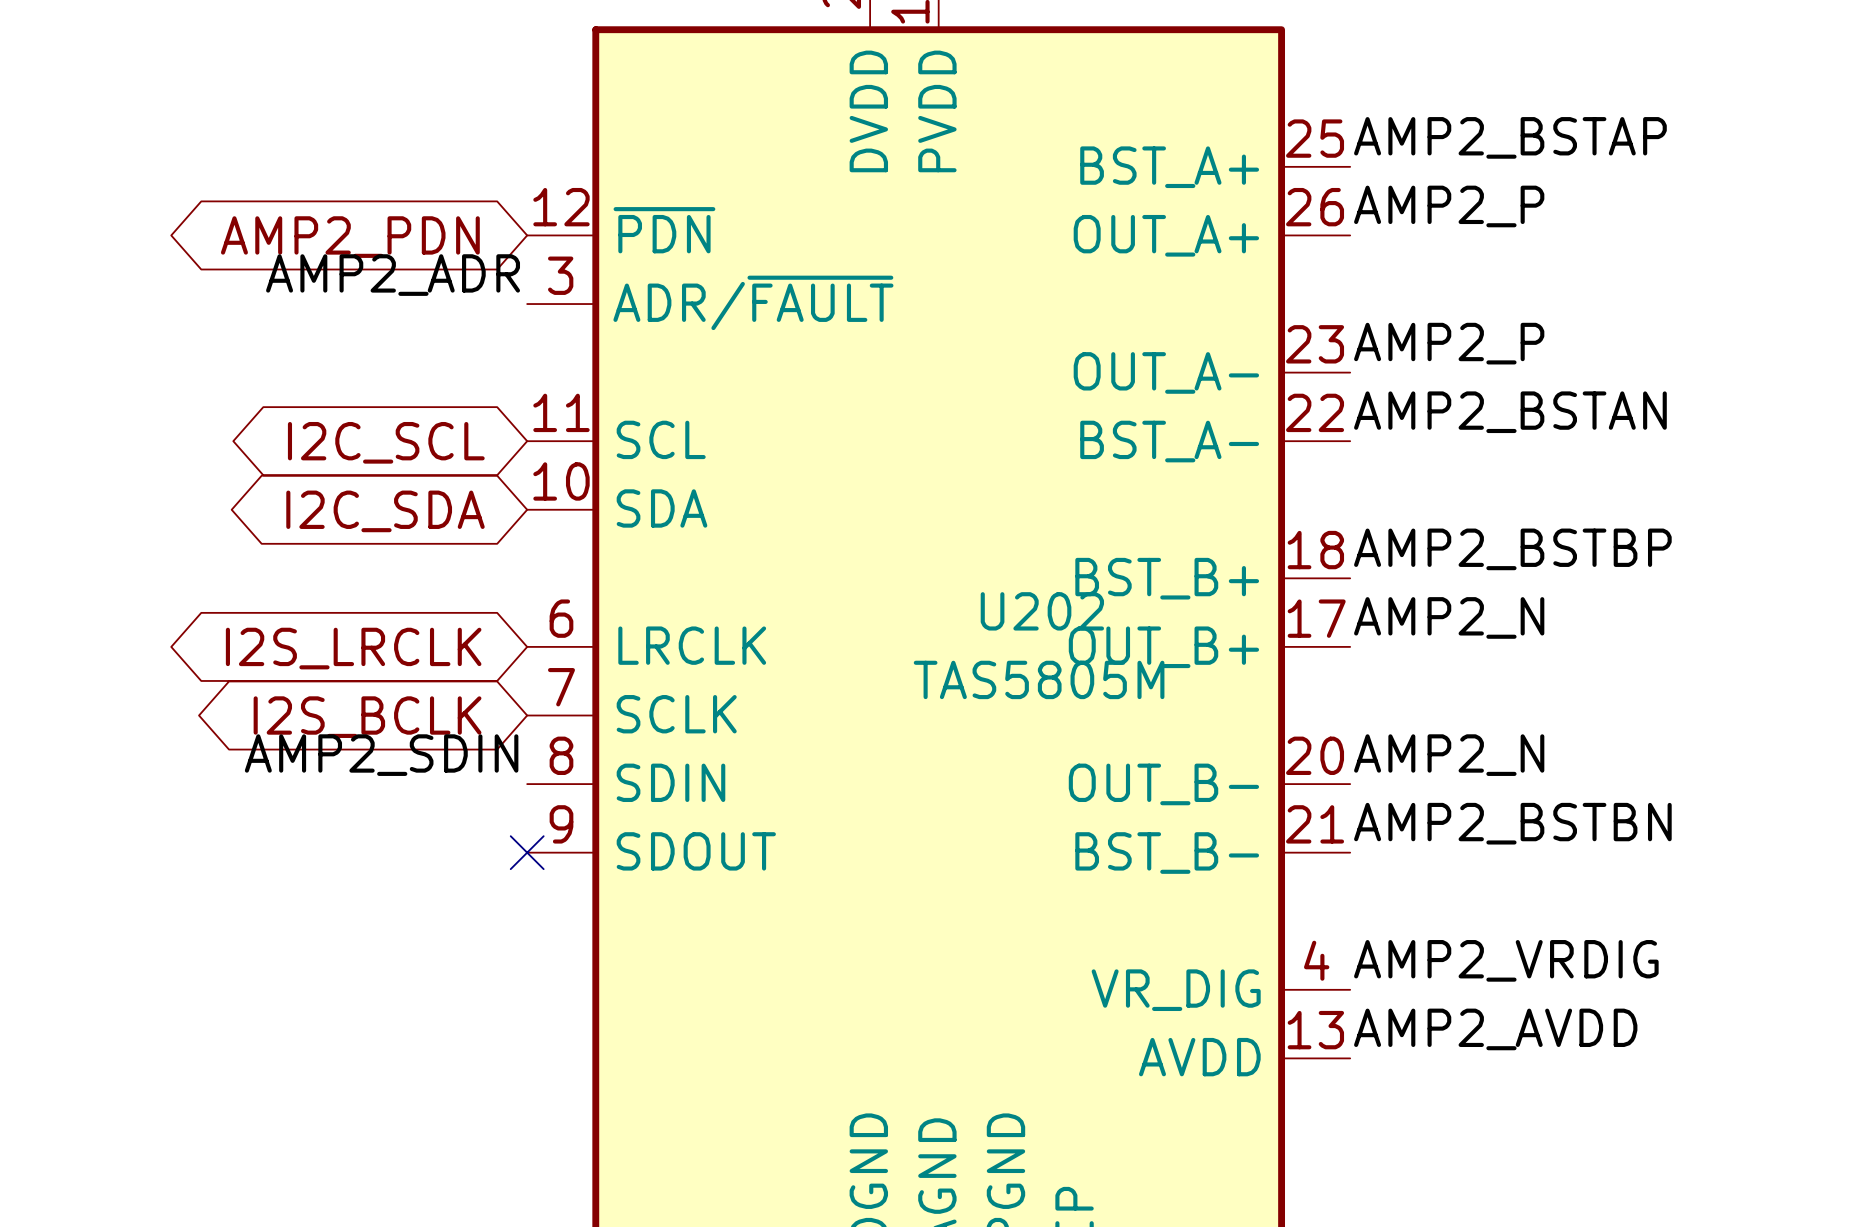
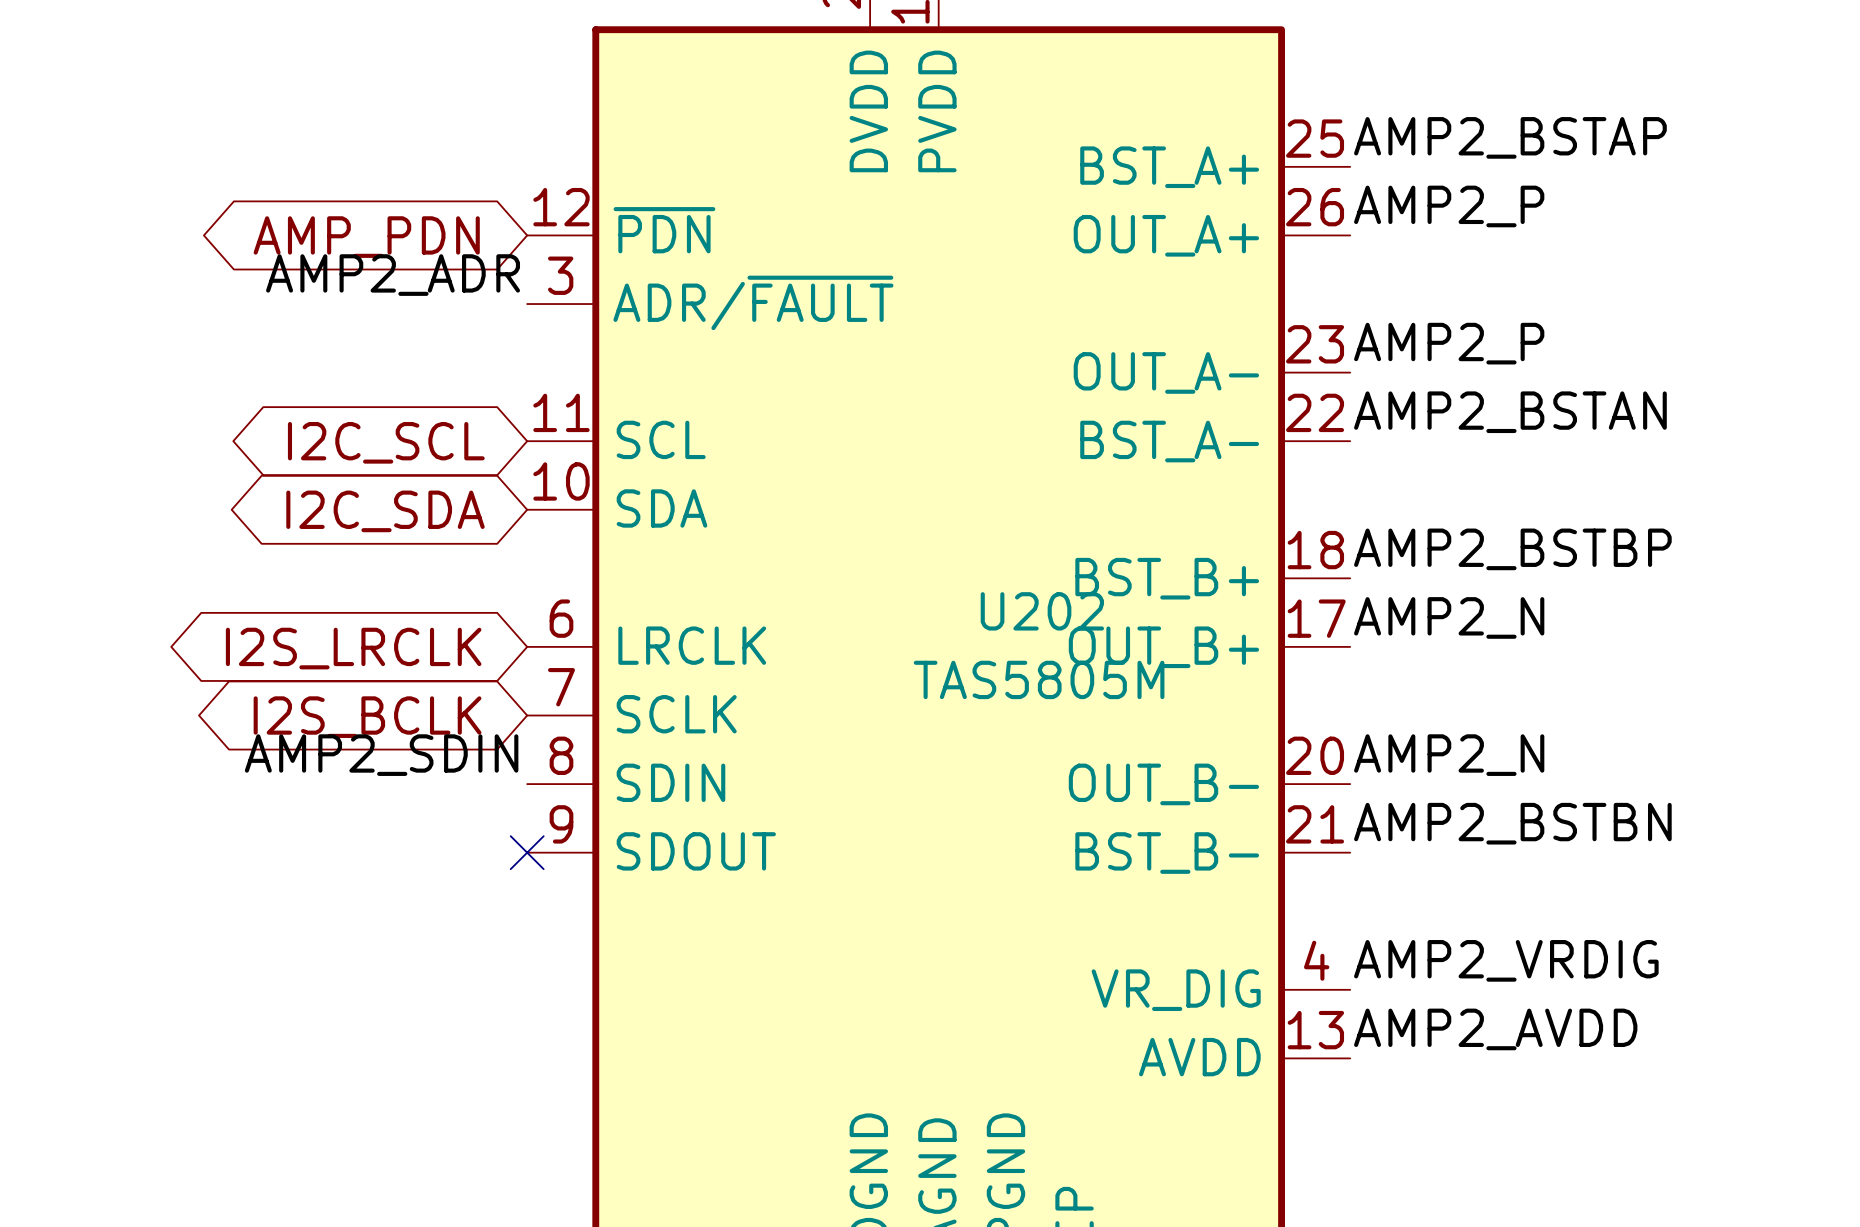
global label: AMP2_PDN (350, 237) -> AMP_PDN (366, 237)

